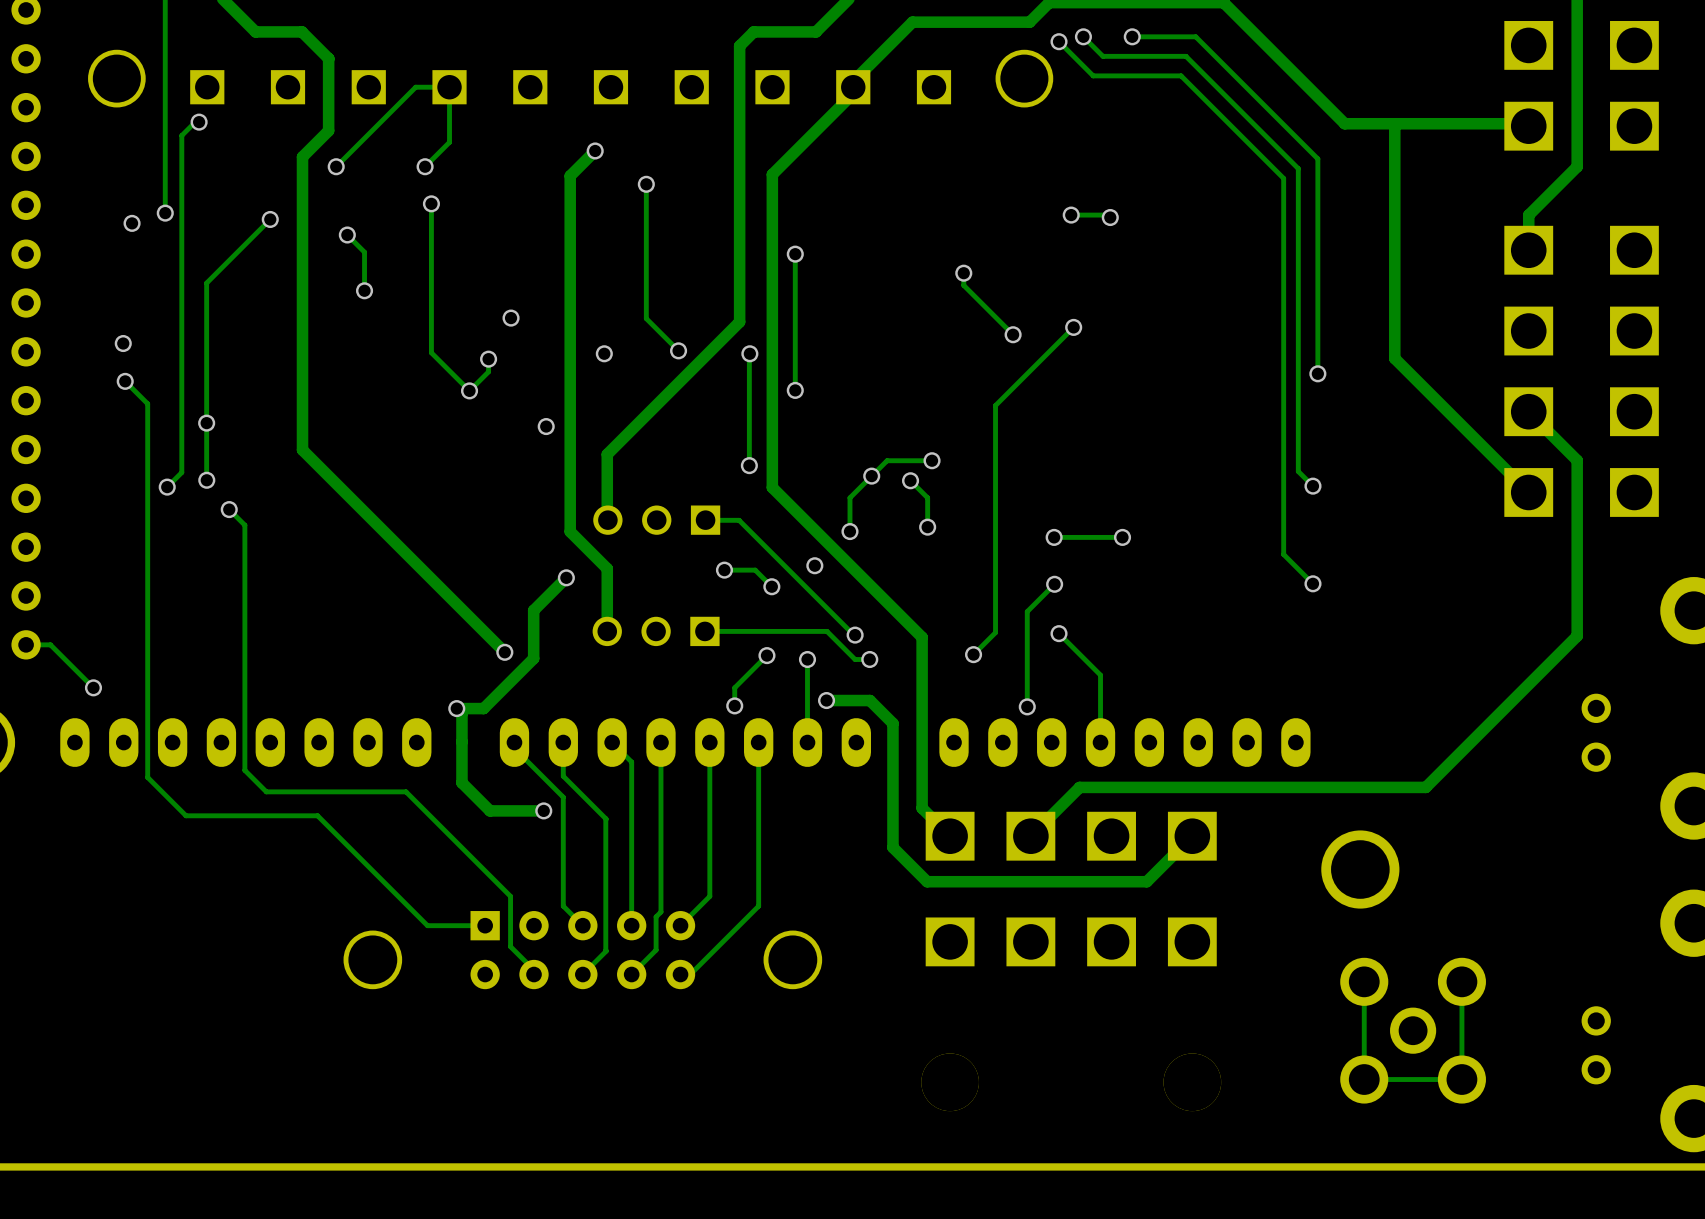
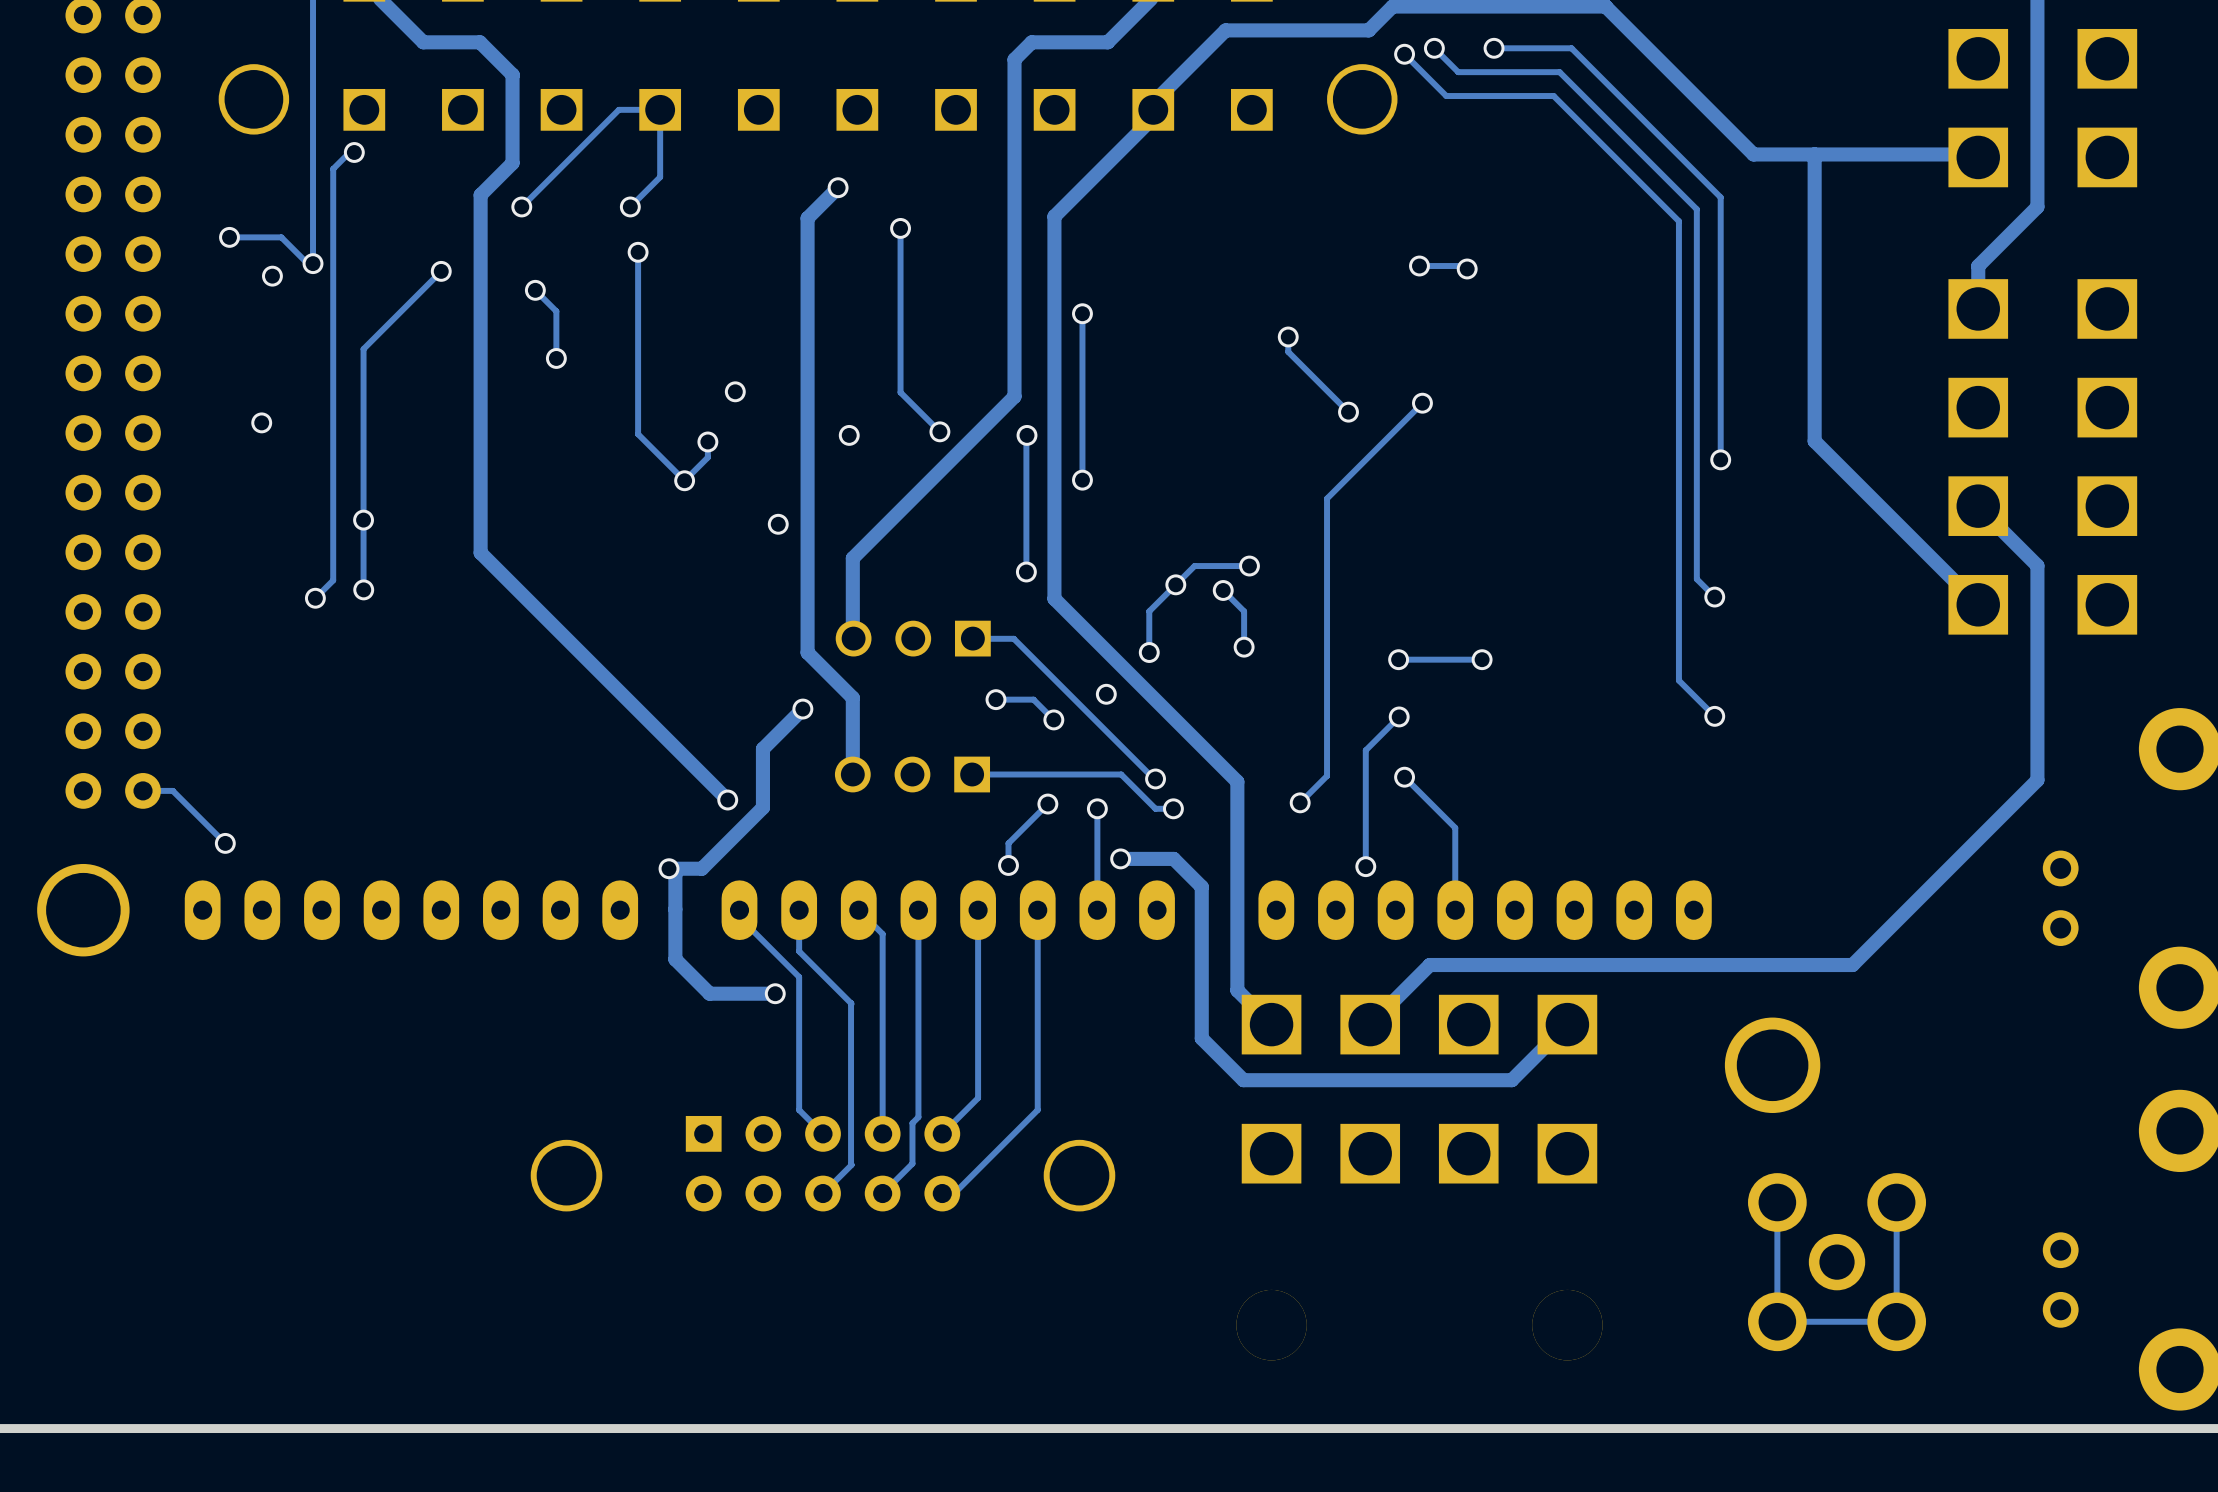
track: none -> (229, 237) (281, 237) (307, 263) (313, 263)
via: none -> (229, 237)
track: (125, 381) (147, 403) (147, 777) (186, 815) (317, 815) (427, 925) (485, 925) -> none
via: (125, 381) -> none
track: (229, 509) (244, 525) (244, 770) (266, 791) (406, 791) (510, 896) (510, 946) (534, 970) (534, 974) -> none
via: (229, 509) -> none

